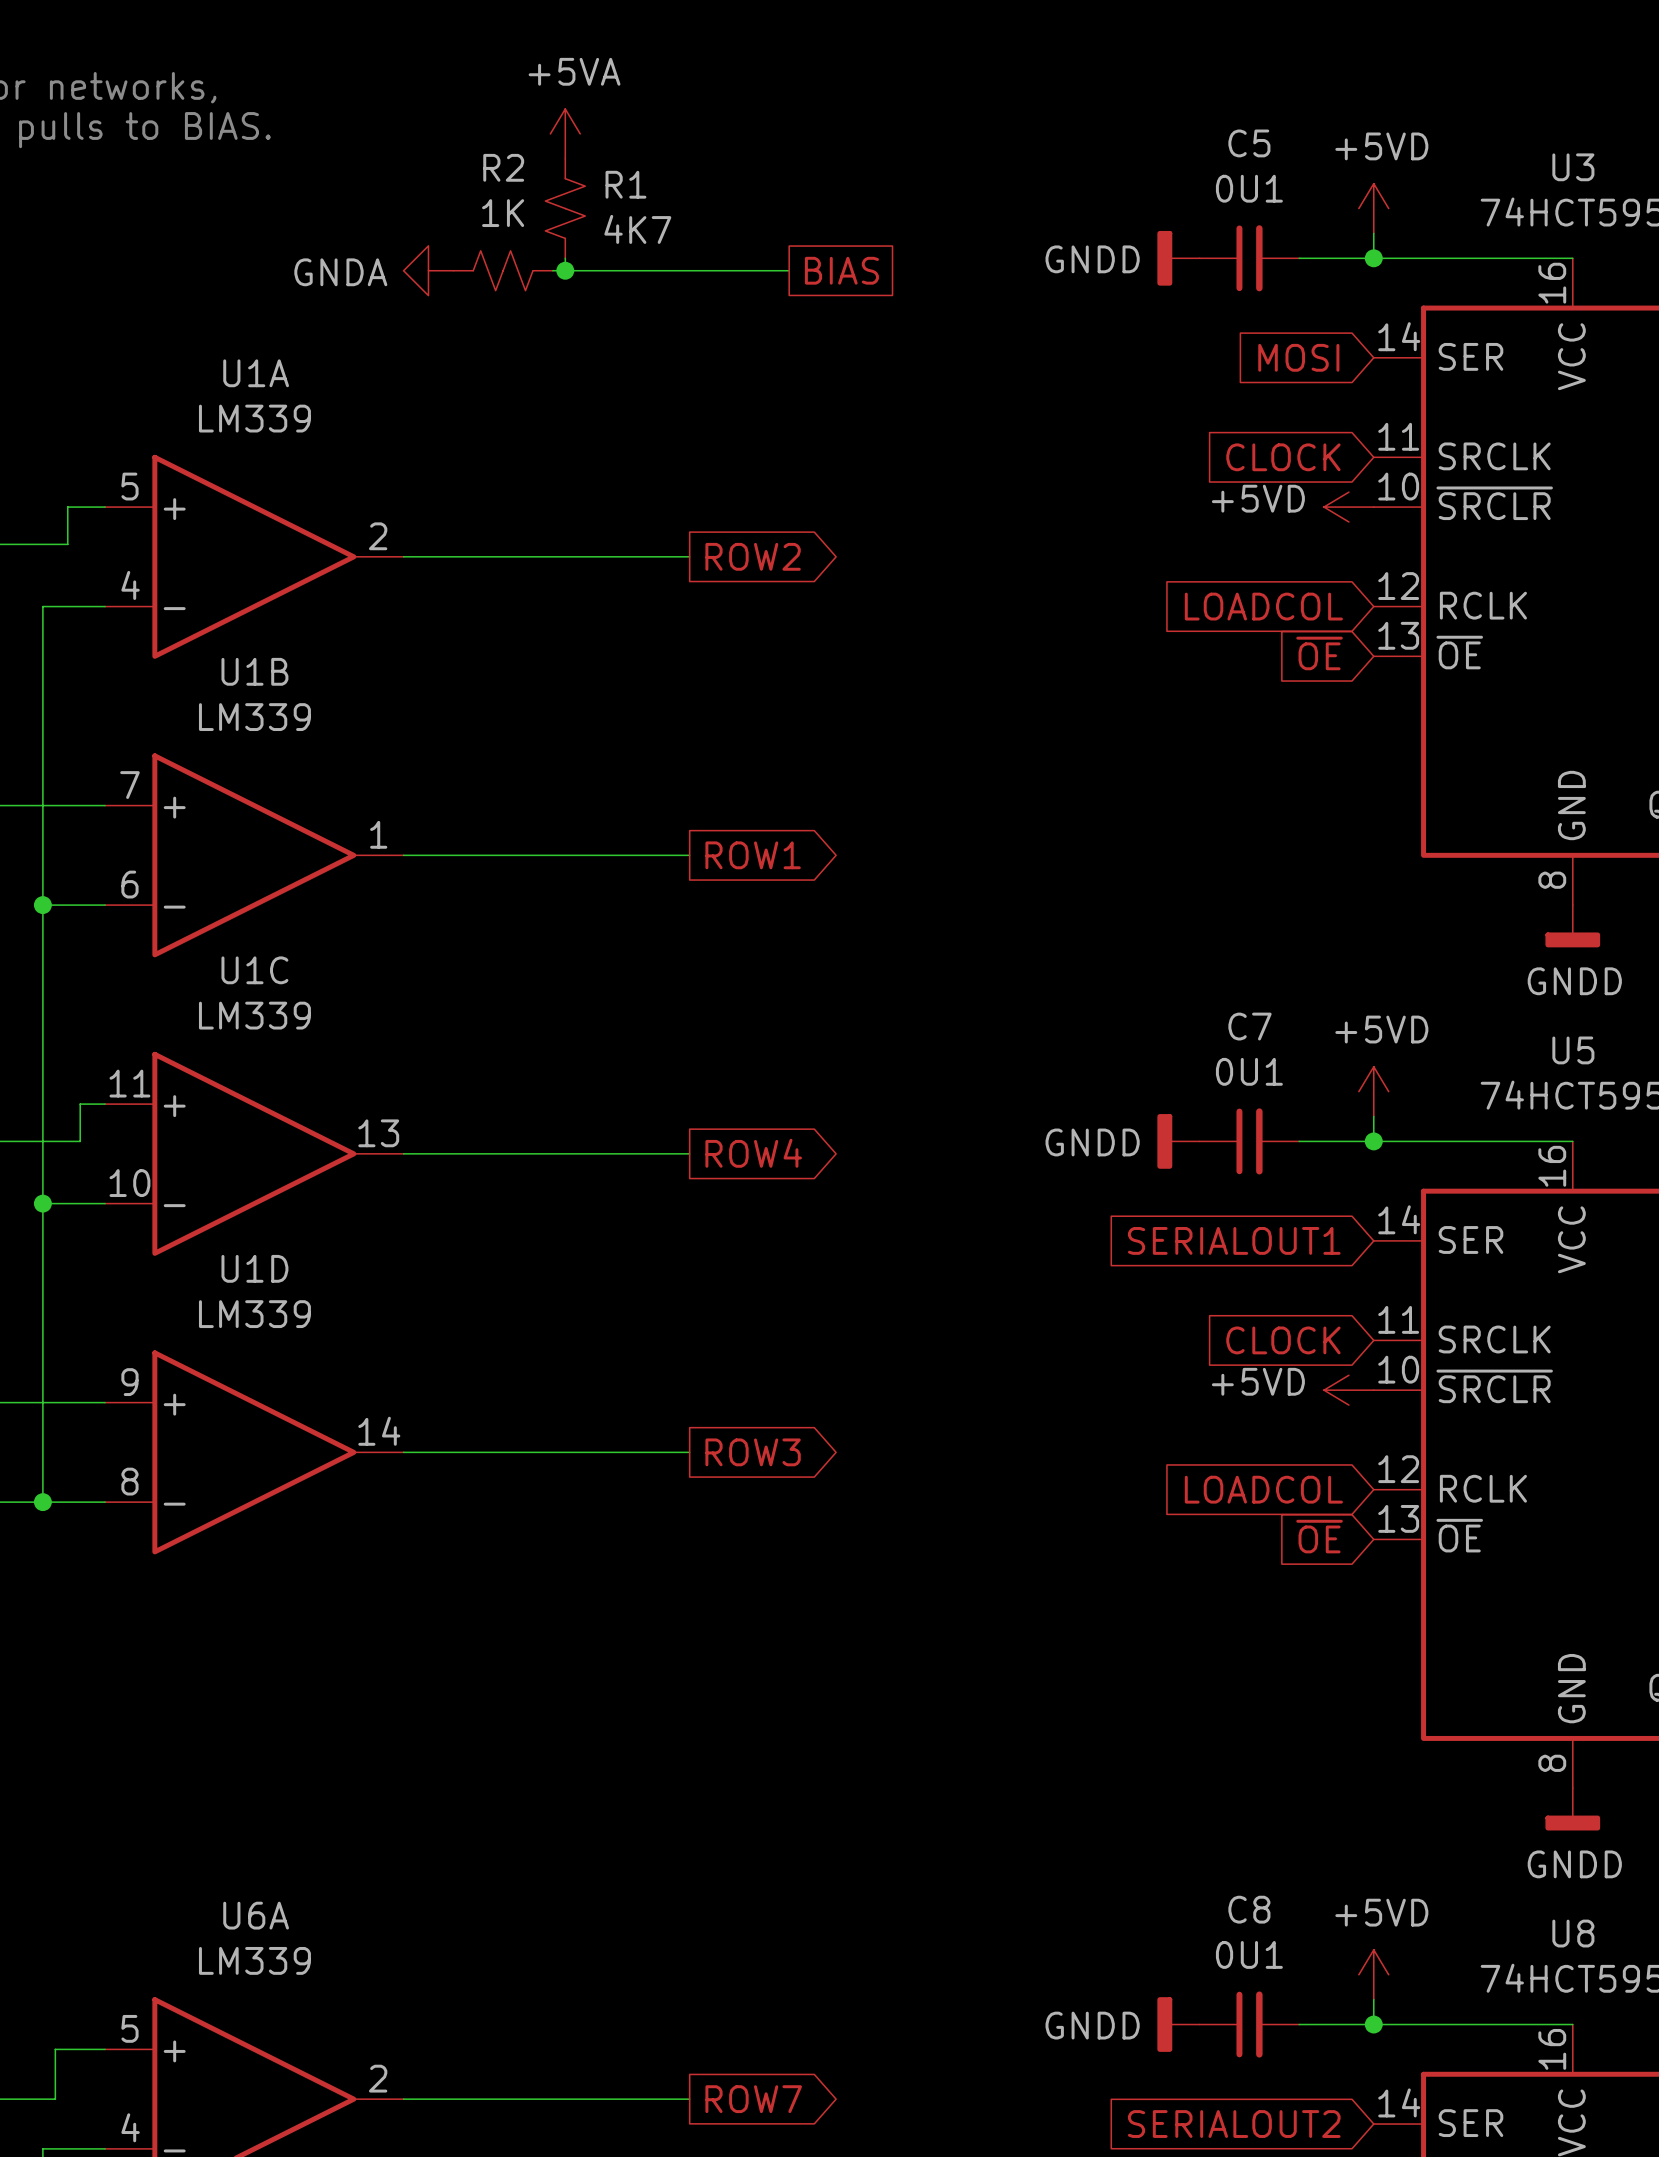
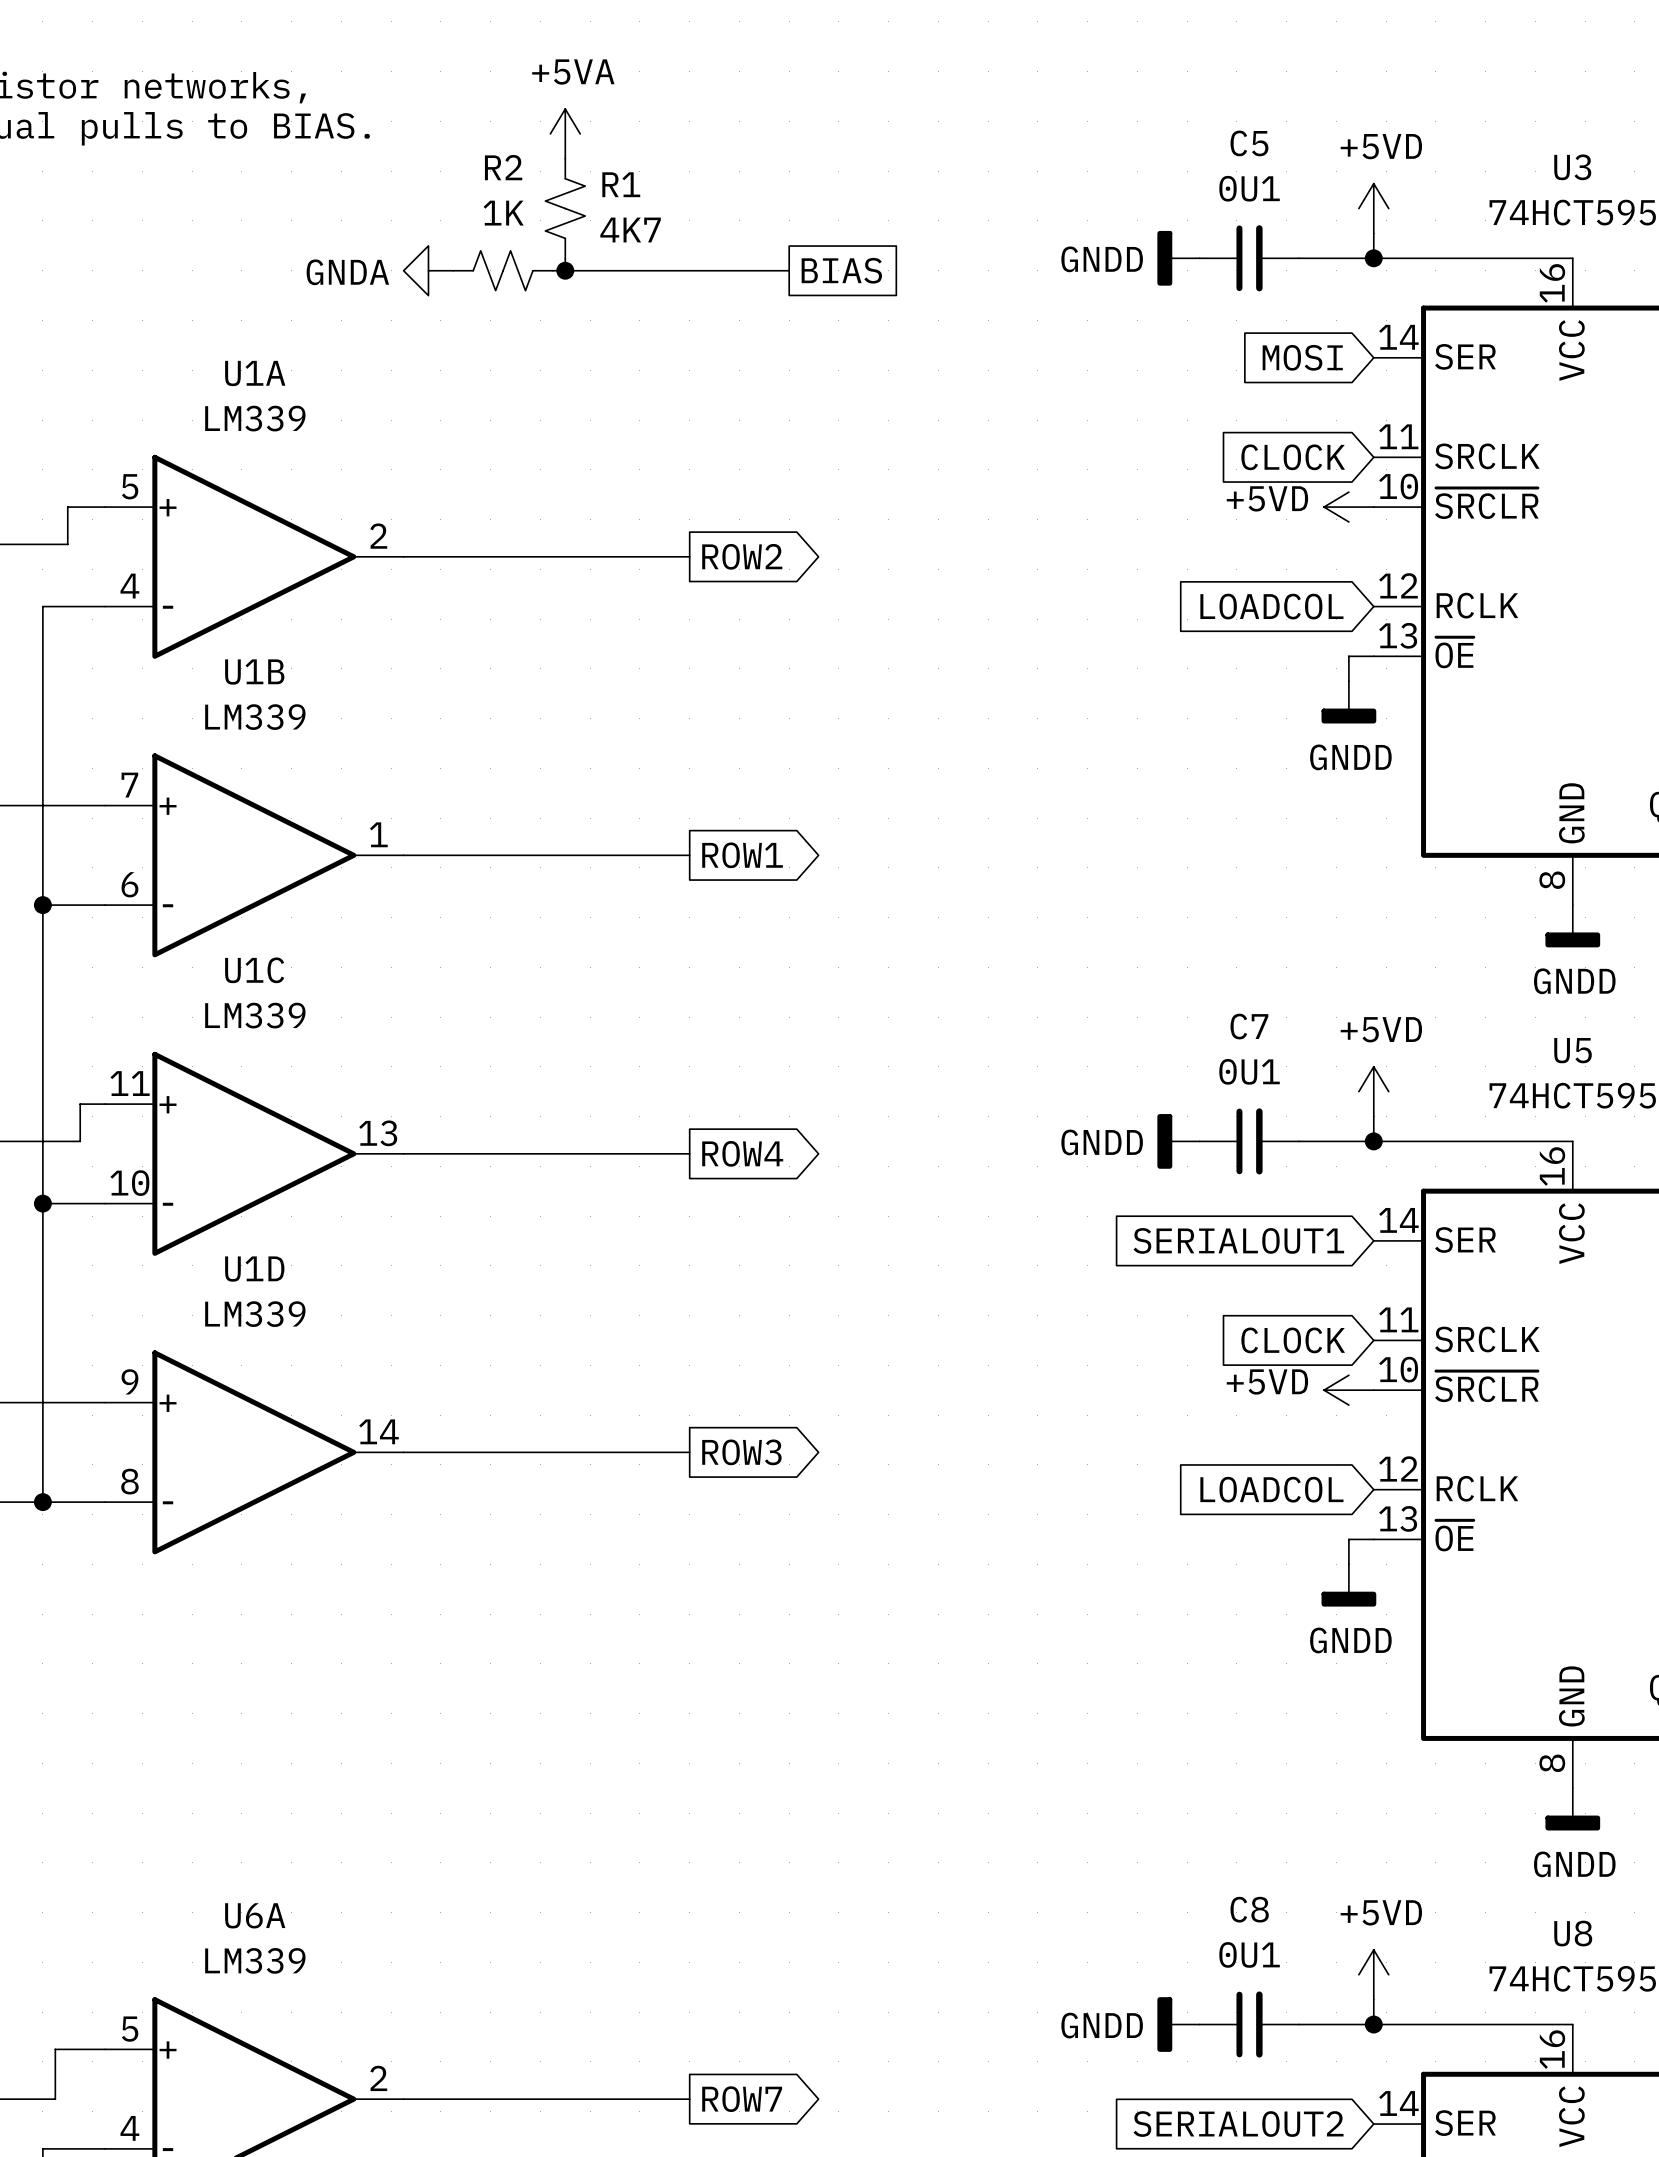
global label: ~{OE} (1319, 653) -> none
wire: none -> (1373, 656) (1348, 656) (1348, 681)
power symbol: none -> GNDD (1348, 702)
global label: ~{OE} (1319, 1536) -> none
wire: none -> (1373, 1539) (1348, 1539) (1348, 1564)
power symbol: none -> GNDD (1348, 1585)

